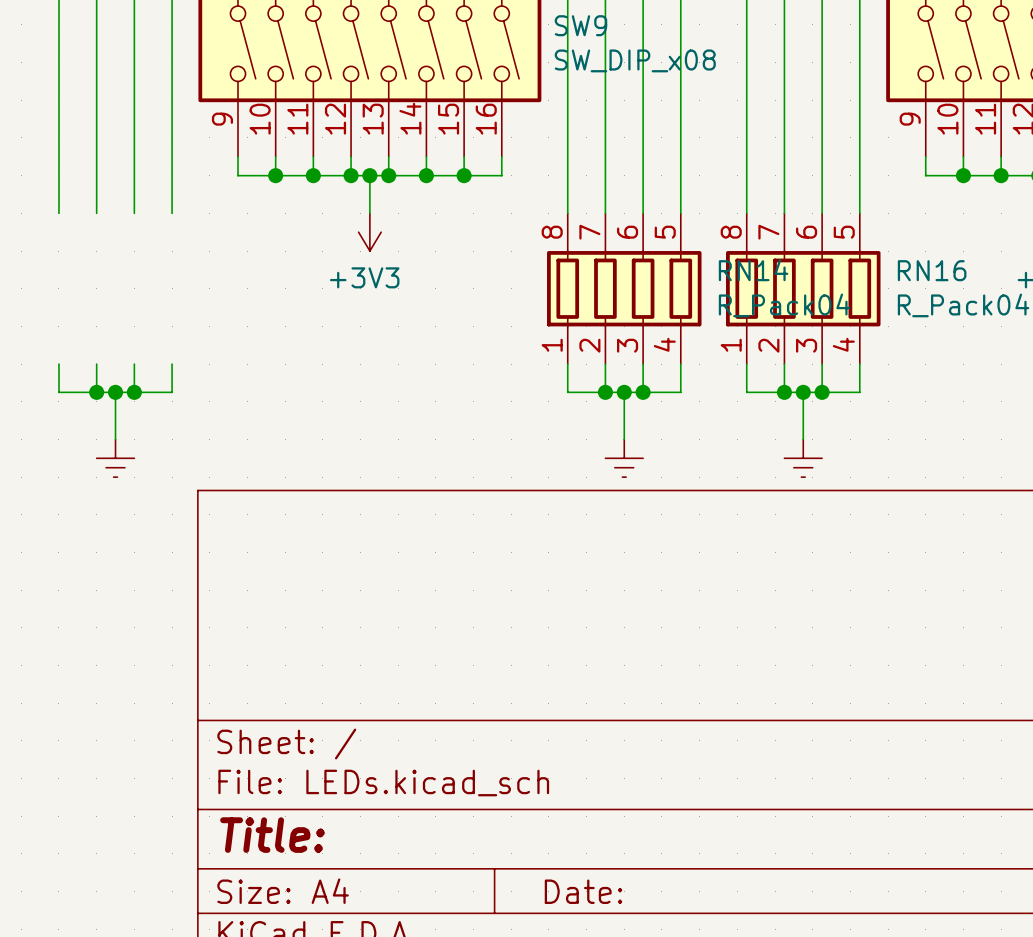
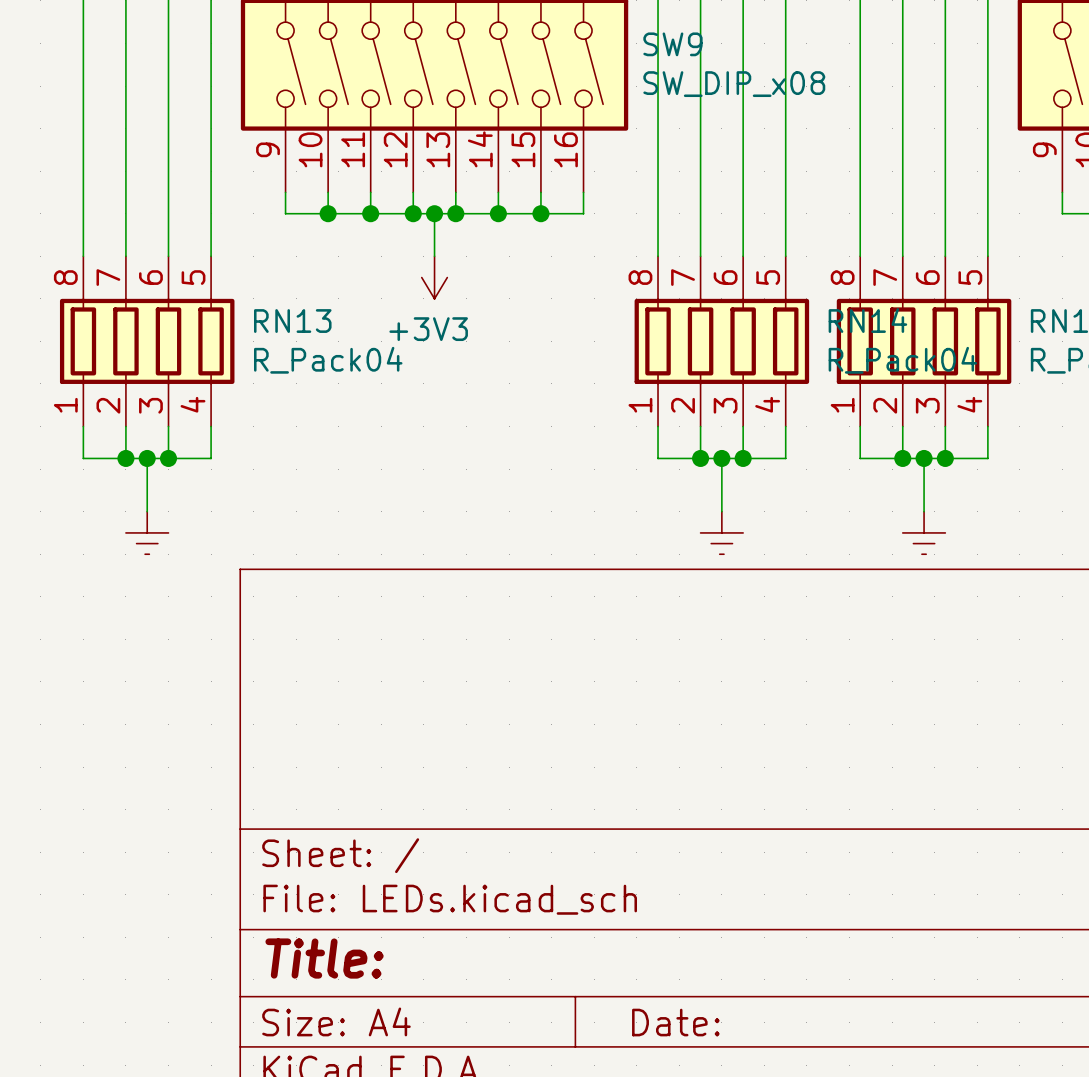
RN13: none -> R_Pack04 (147, 341)

